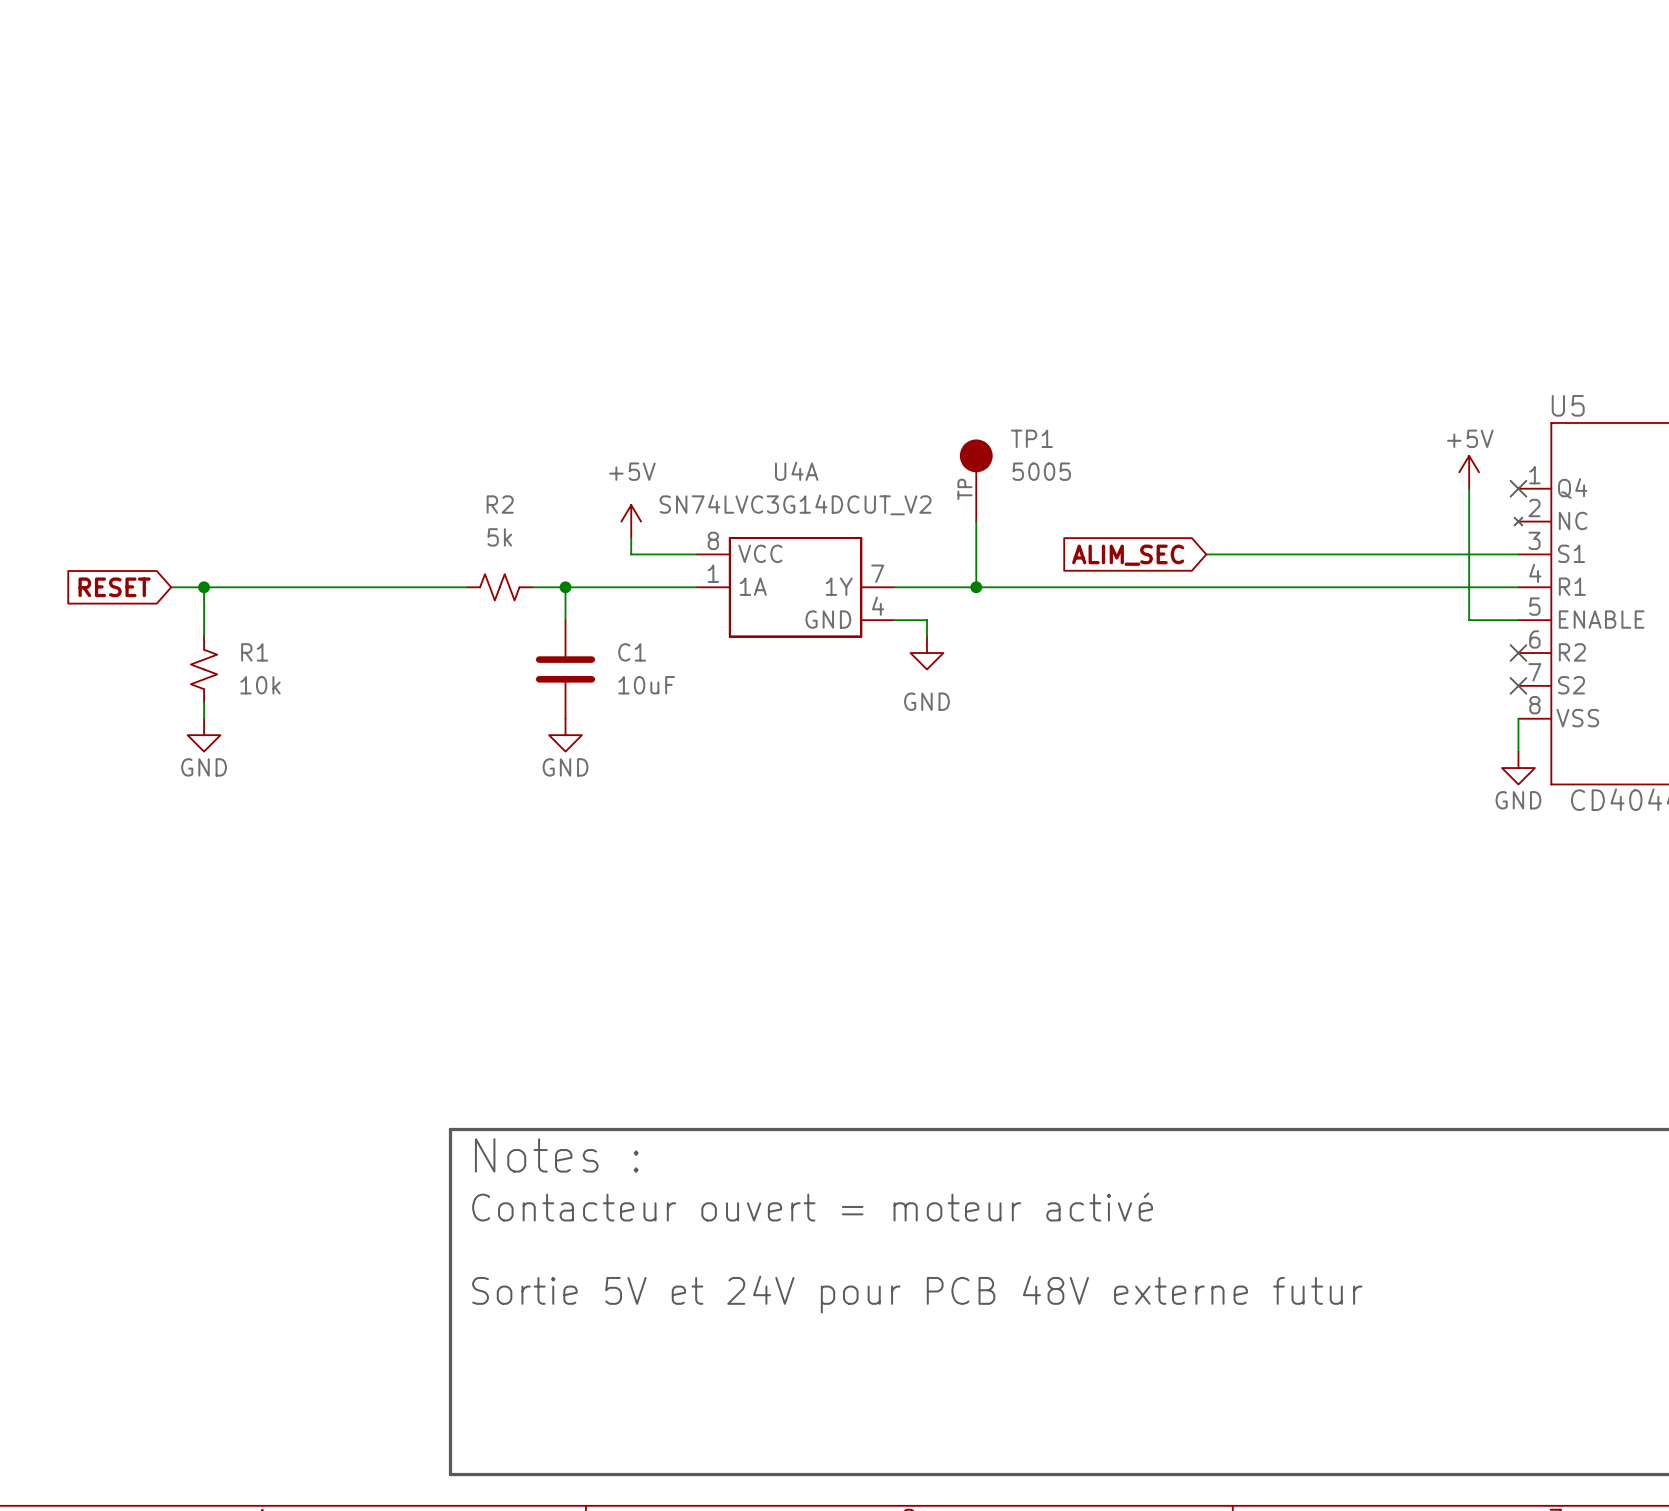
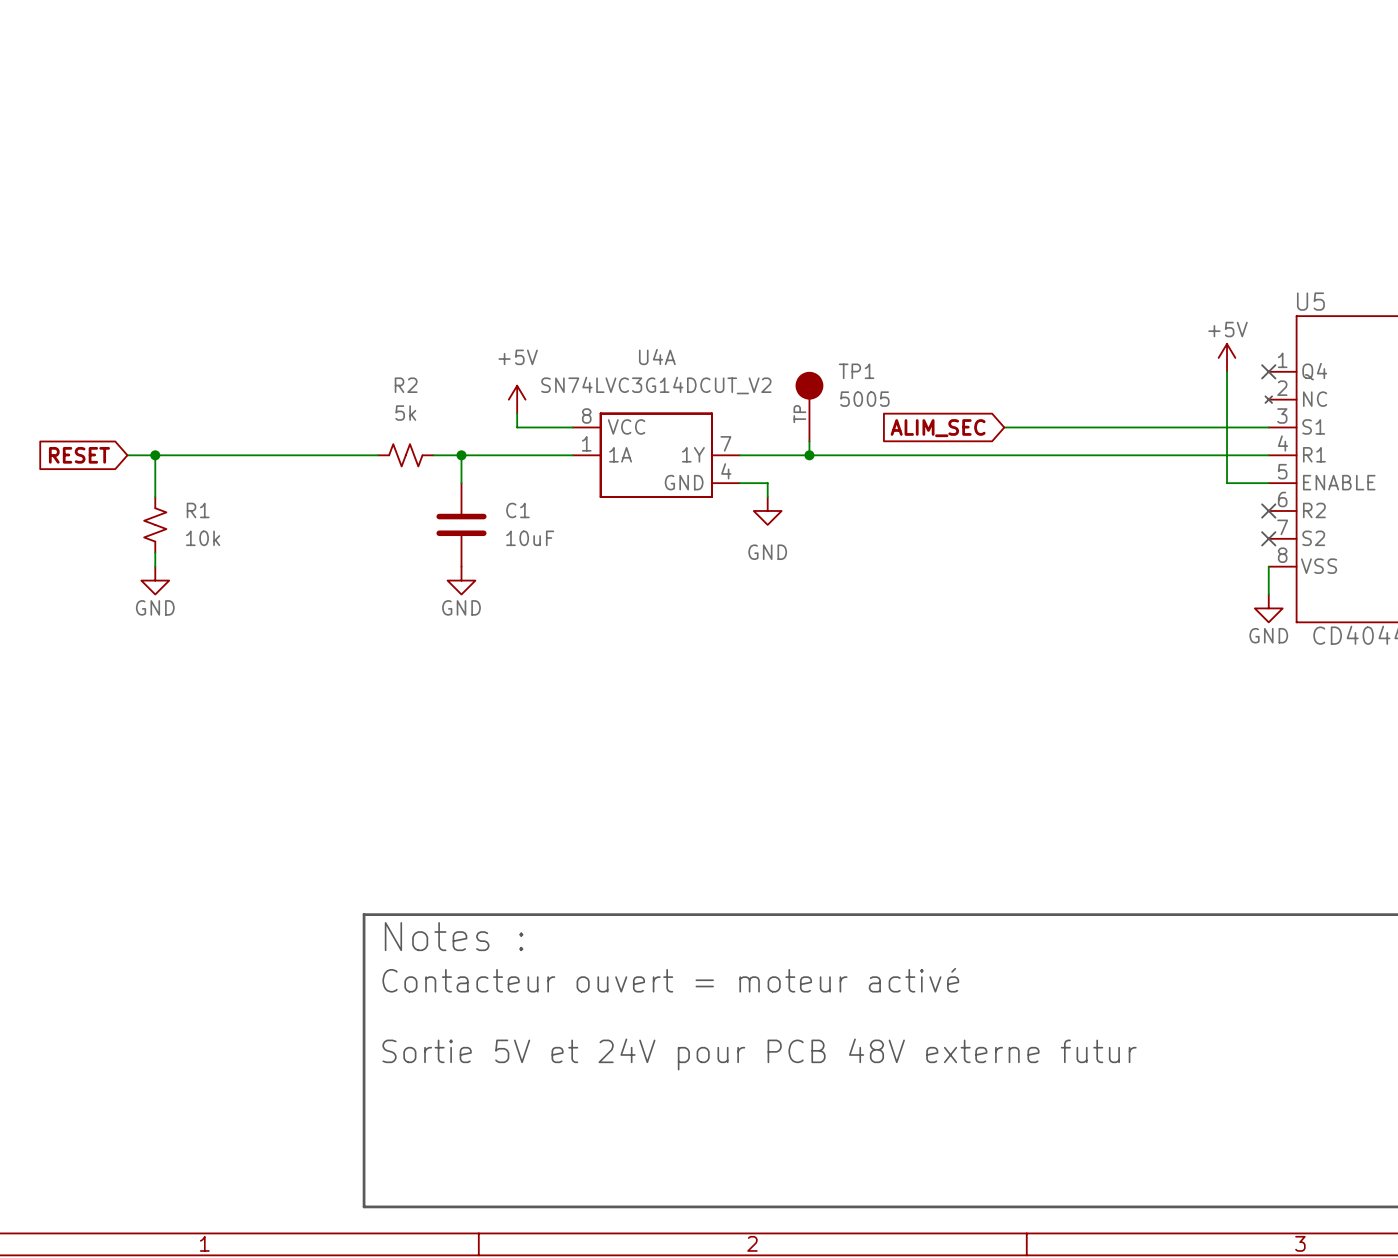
TP1 position: (976, 480) -> (809, 406)

